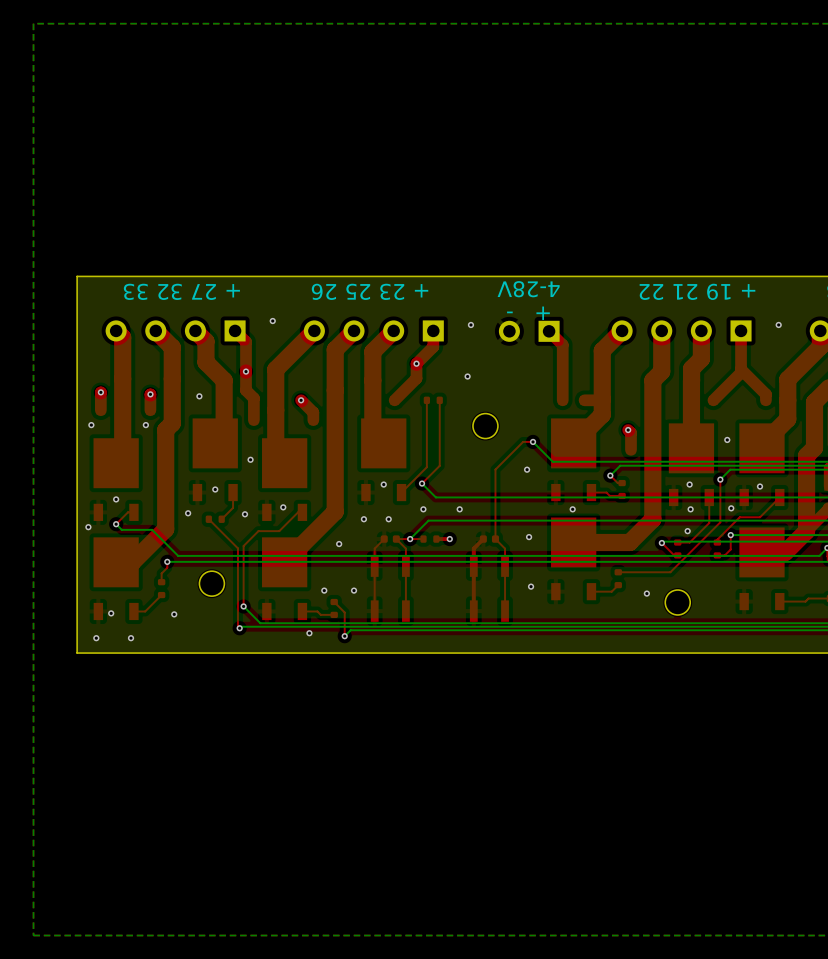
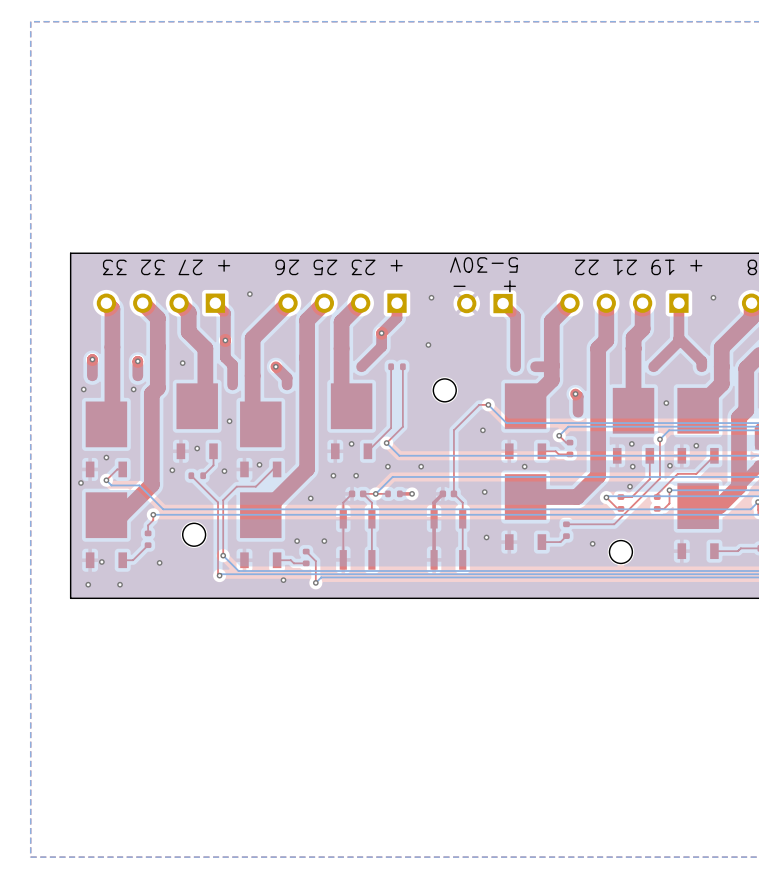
text: 4-28V (528, 289) -> 5-30V (484, 264)

